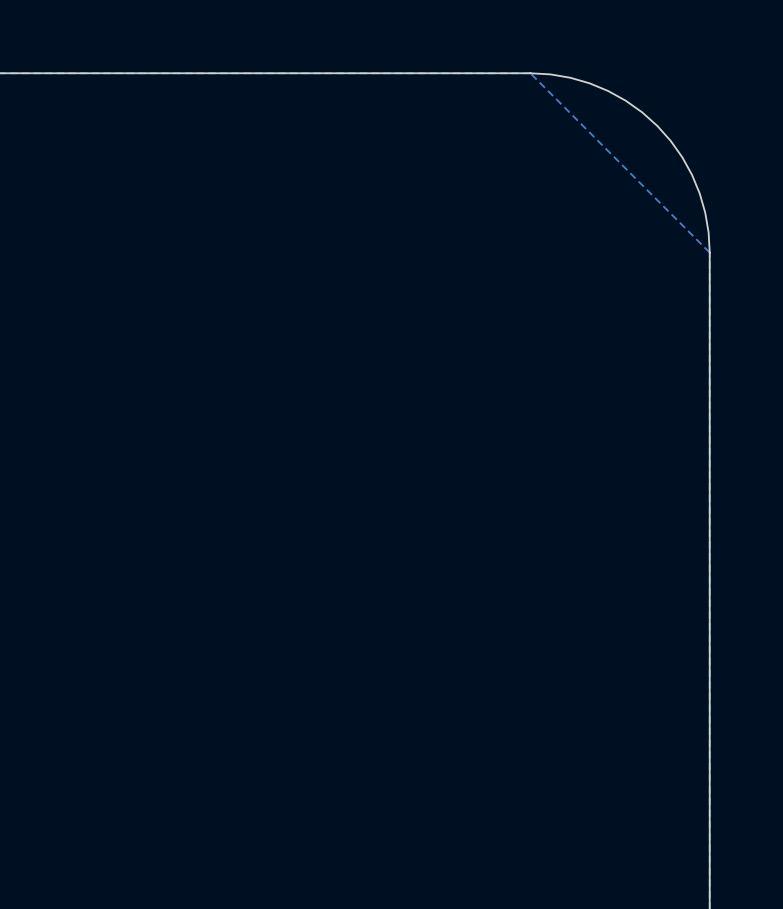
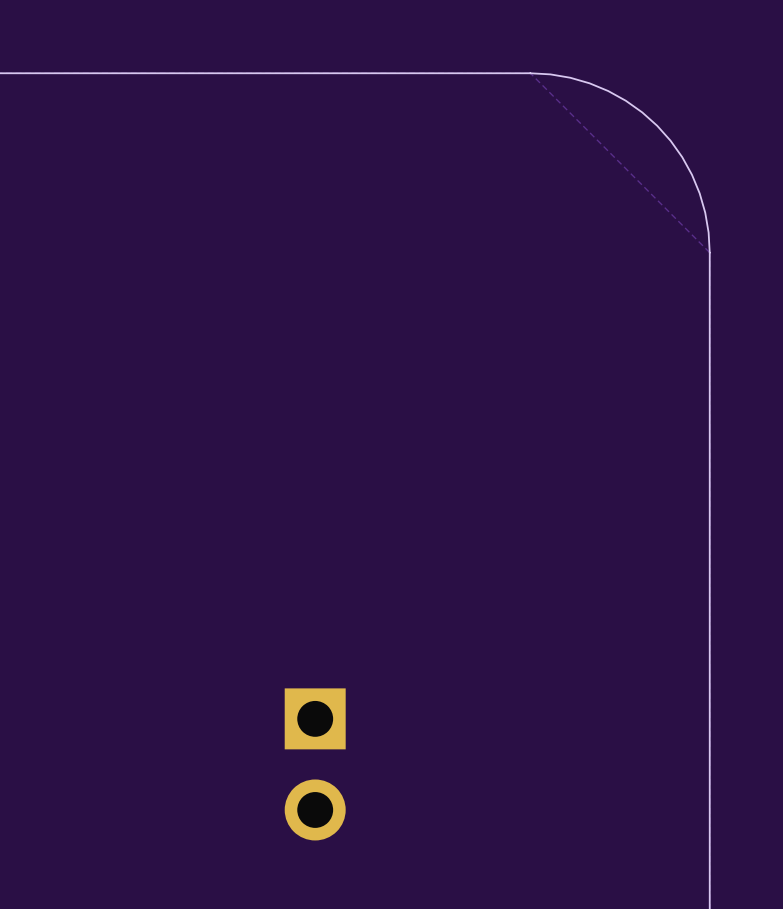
part: none -> (315, 764)

